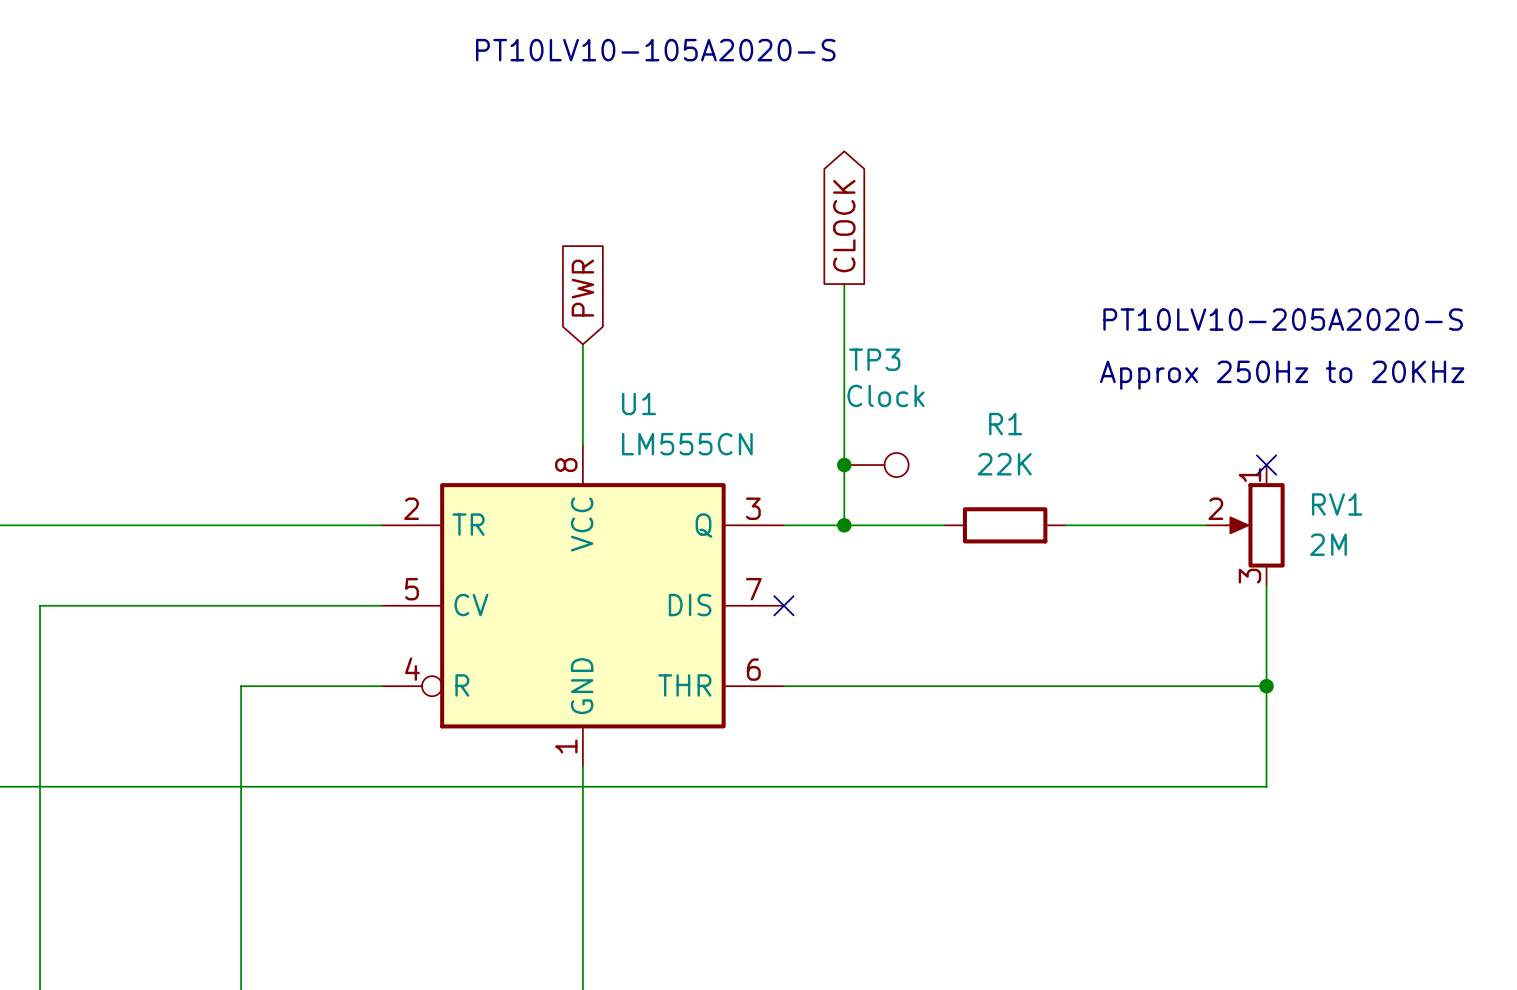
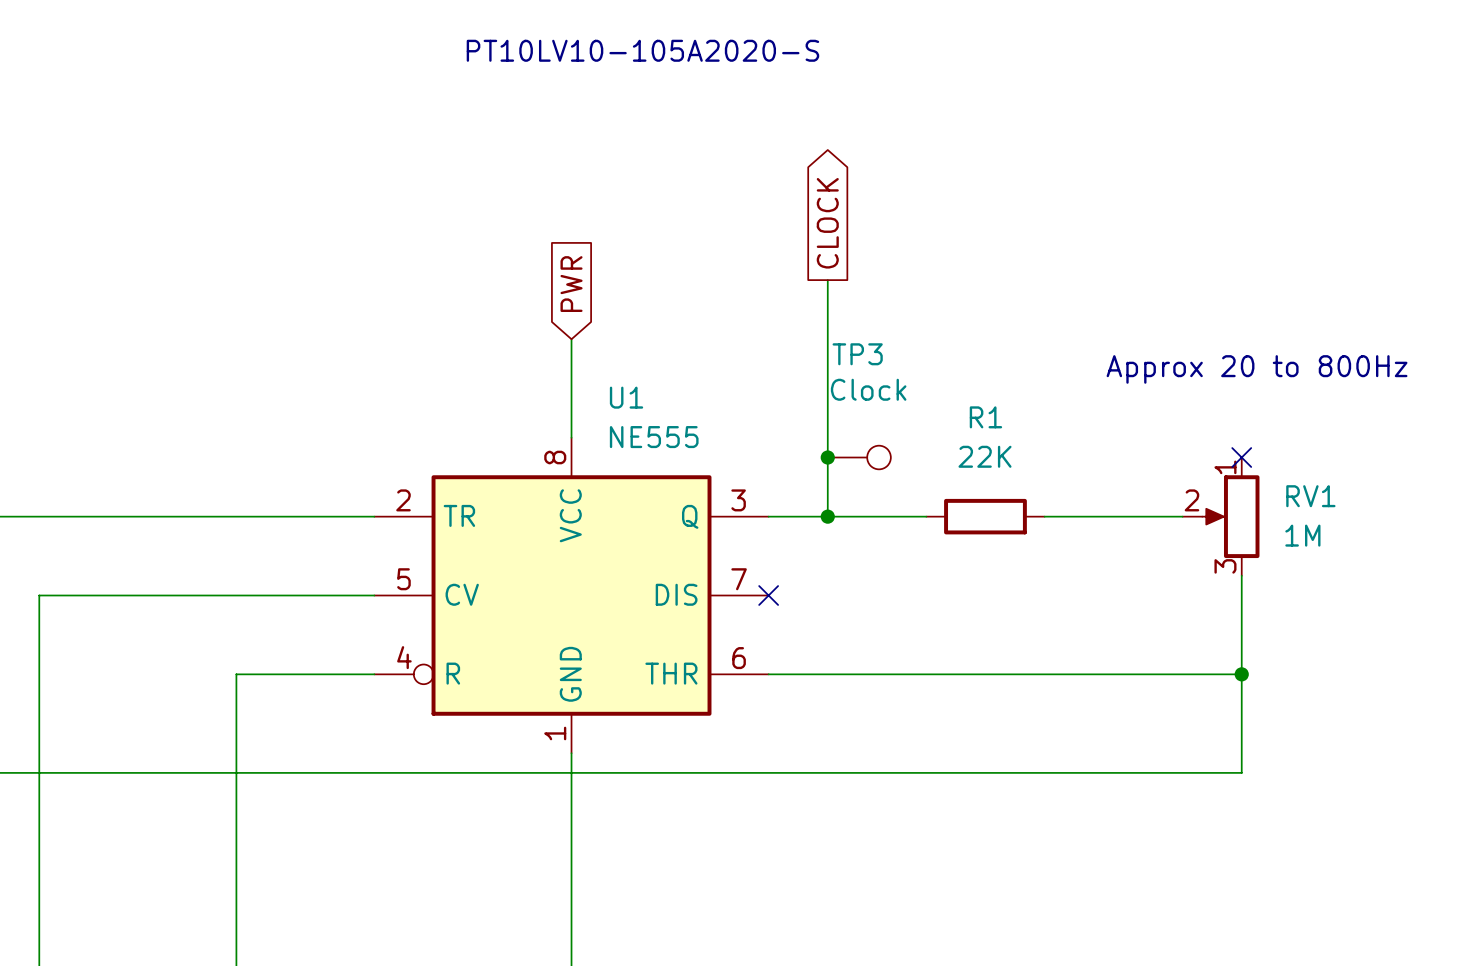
text: PT10LV10-205A2020-S (1283, 319) -> none
text: Approx 250Hz to 20KHz (1282, 375) -> Approx 20 to 800Hz (1257, 369)
U1 value: LM555CN (687, 444) -> NE555 (654, 437)
RV1 value: 2M (1328, 544) -> 1M (1302, 535)

